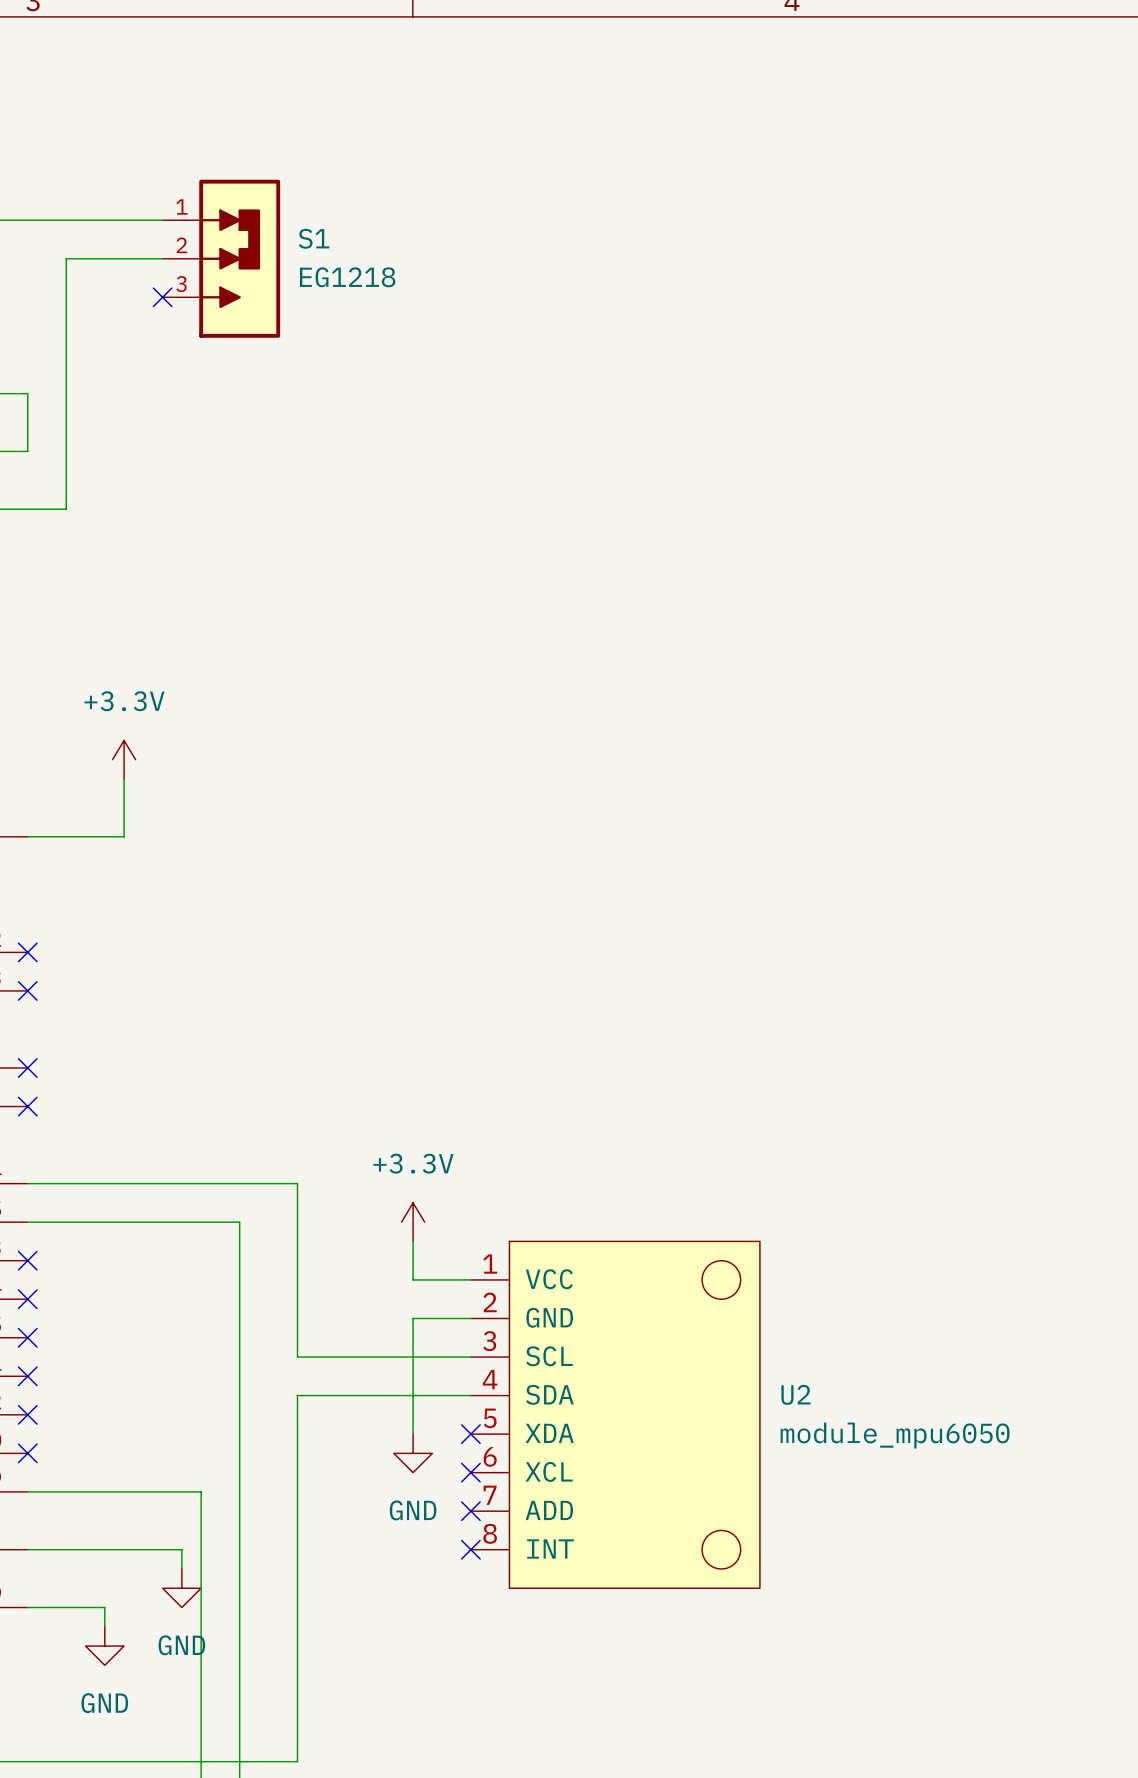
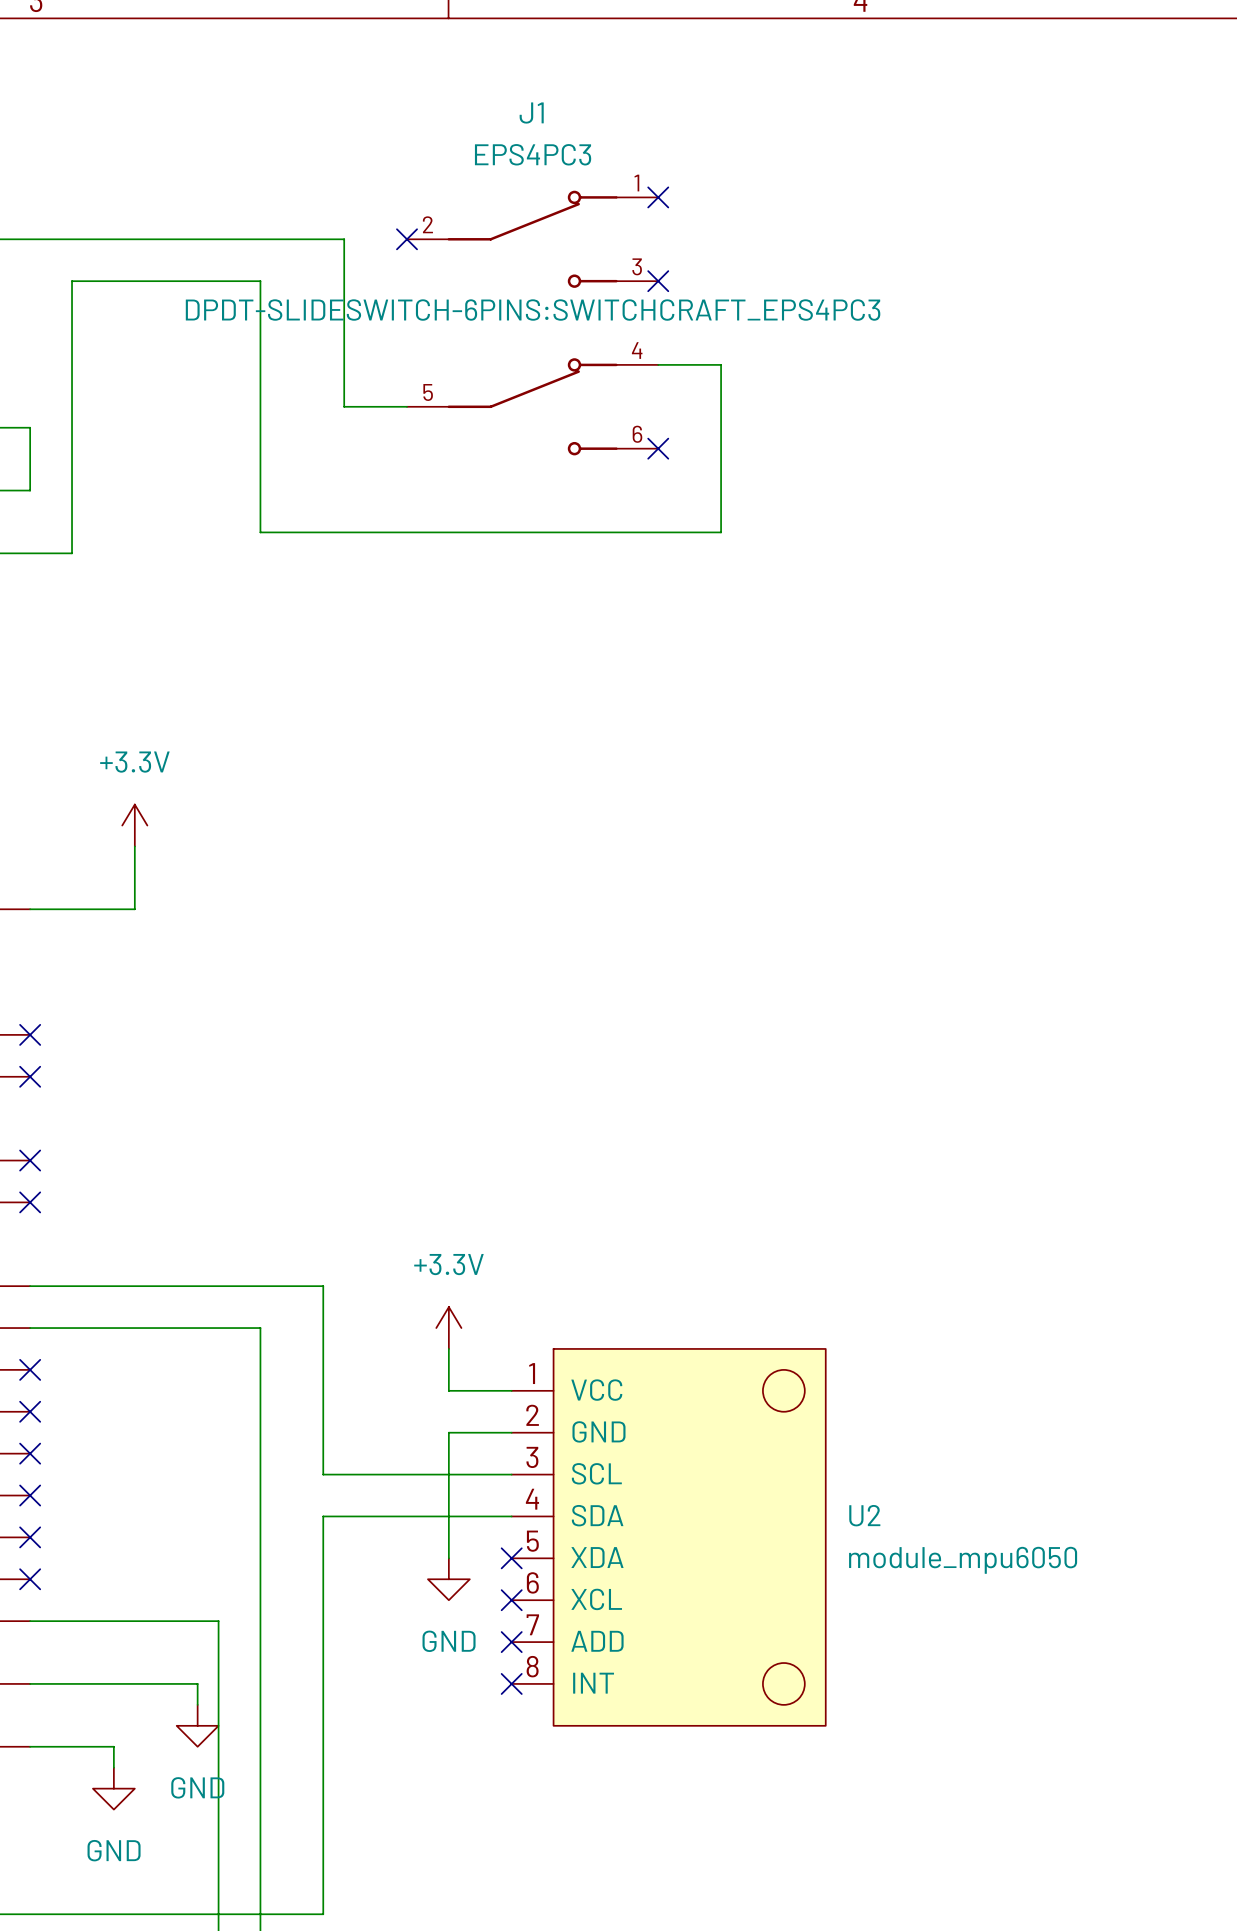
no-connect mark: none -> (658, 197)
wire: none -> (176, 239) (344, 239) (344, 406) (407, 406)
no-connect mark: none -> (407, 239)
wire: none -> (176, 281) (260, 281) (260, 532) (721, 532) (721, 364) (658, 364)
S1: EG1218 (221, 258) -> none
no-connect mark: none -> (658, 281)
no-connect mark: (162, 297) -> none
J1: none -> EPS4PC3 (532, 323)
no-connect mark: none -> (658, 448)

